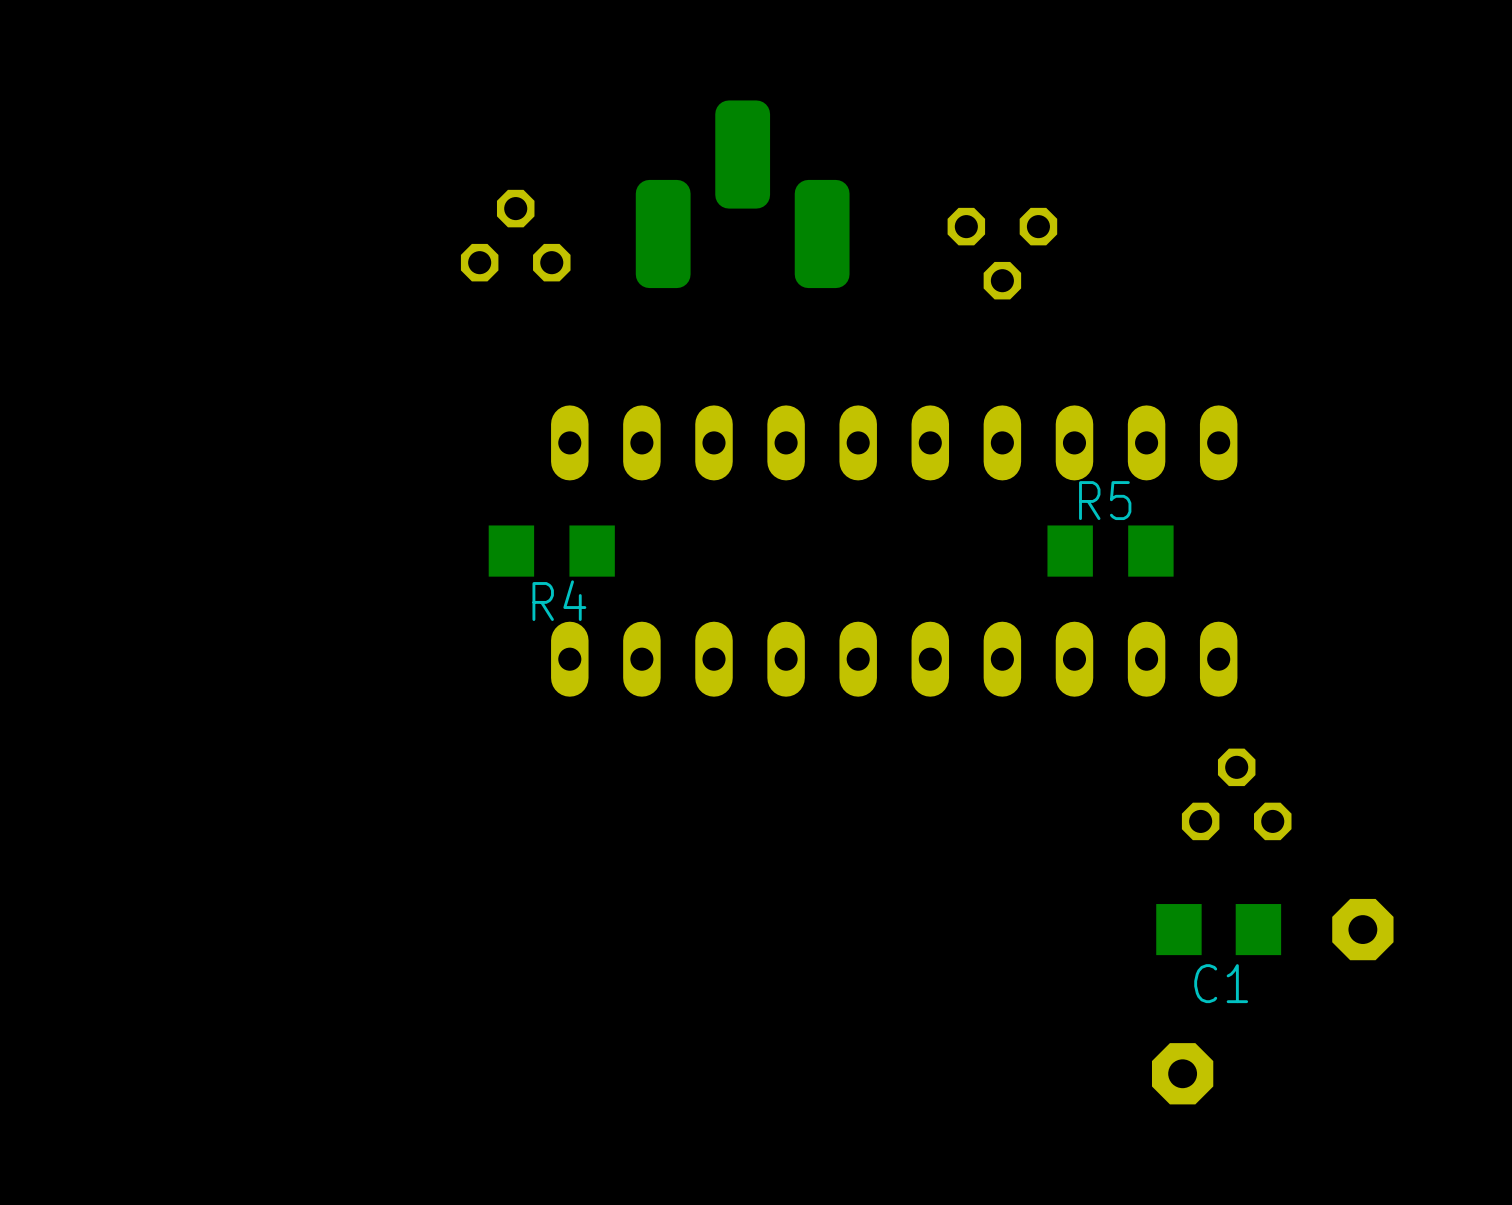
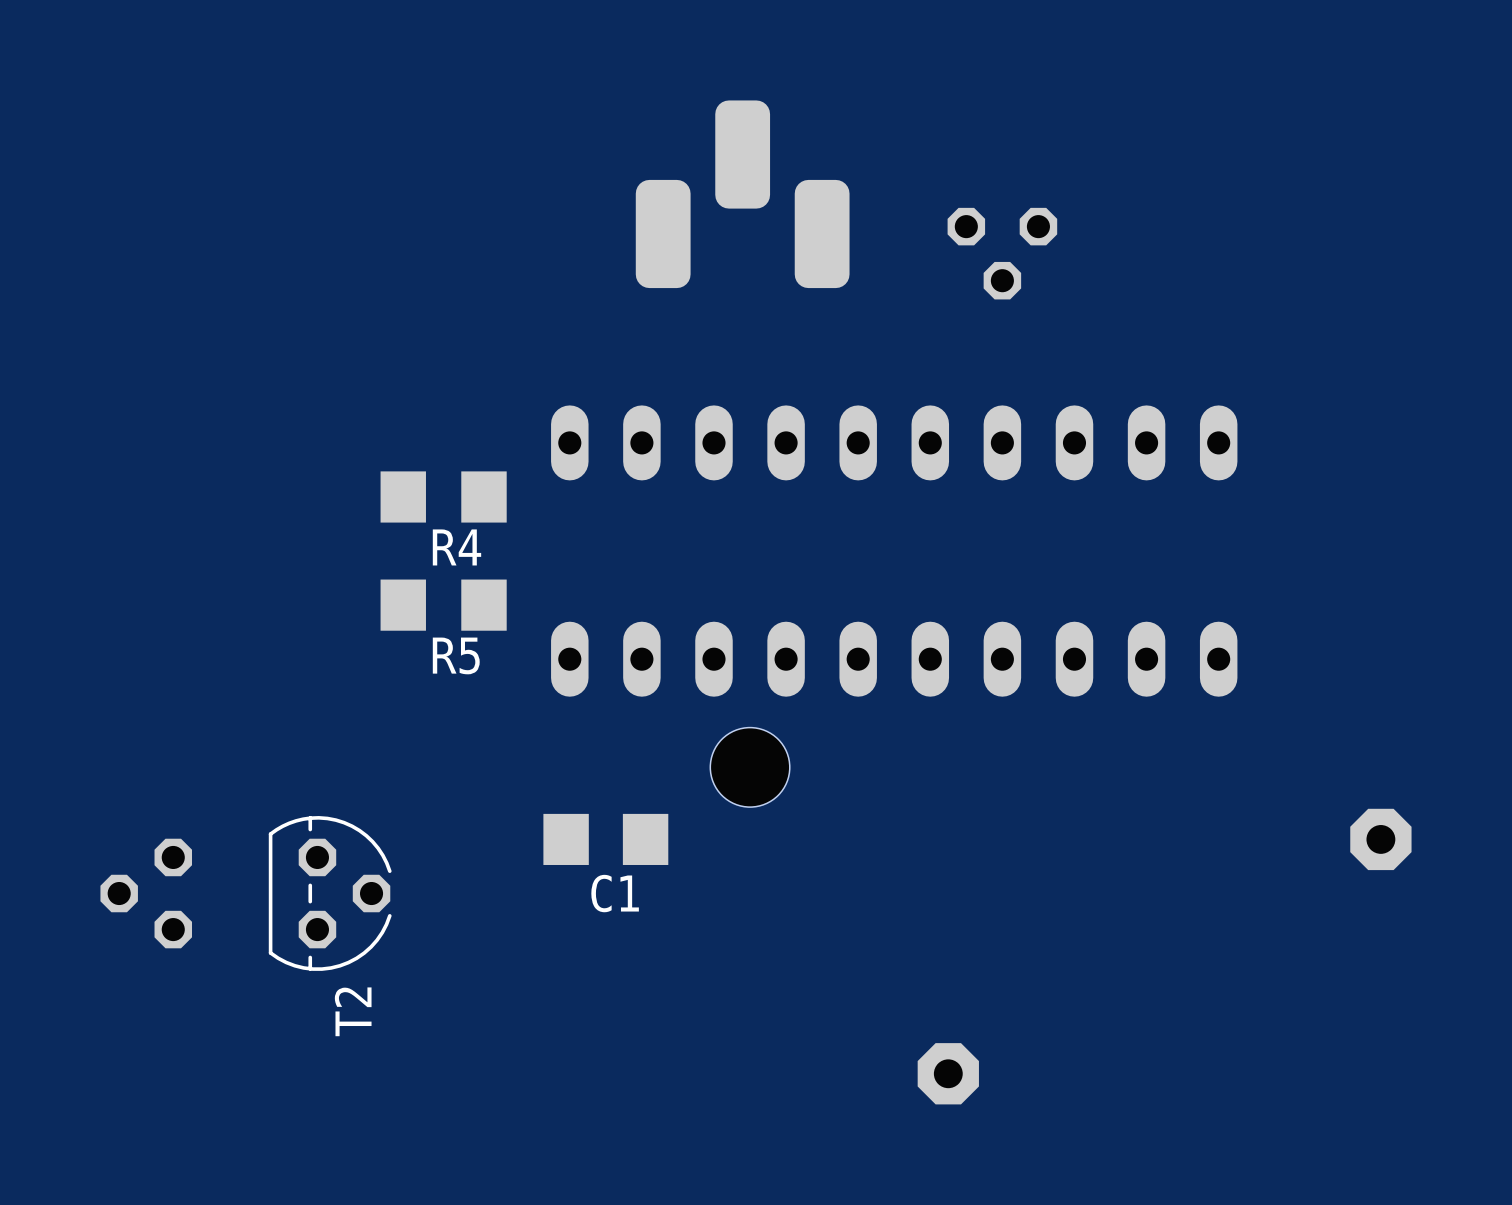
part: (515, 235) -> none
R5 name position: R5 (1105, 500) -> R5 (456, 655)
R4 position: (551, 551) -> (443, 496)
R5 position: (1110, 551) -> (443, 605)
hole: none -> (750, 767)
part: (1236, 794) -> none
part: none -> (146, 893)
T2: none -> (330, 893)
C1 position: (1218, 929) -> (605, 839)
part position: (1362, 929) -> (1380, 839)
part: none -> (948, 1073)
part: (1182, 1073) -> none

